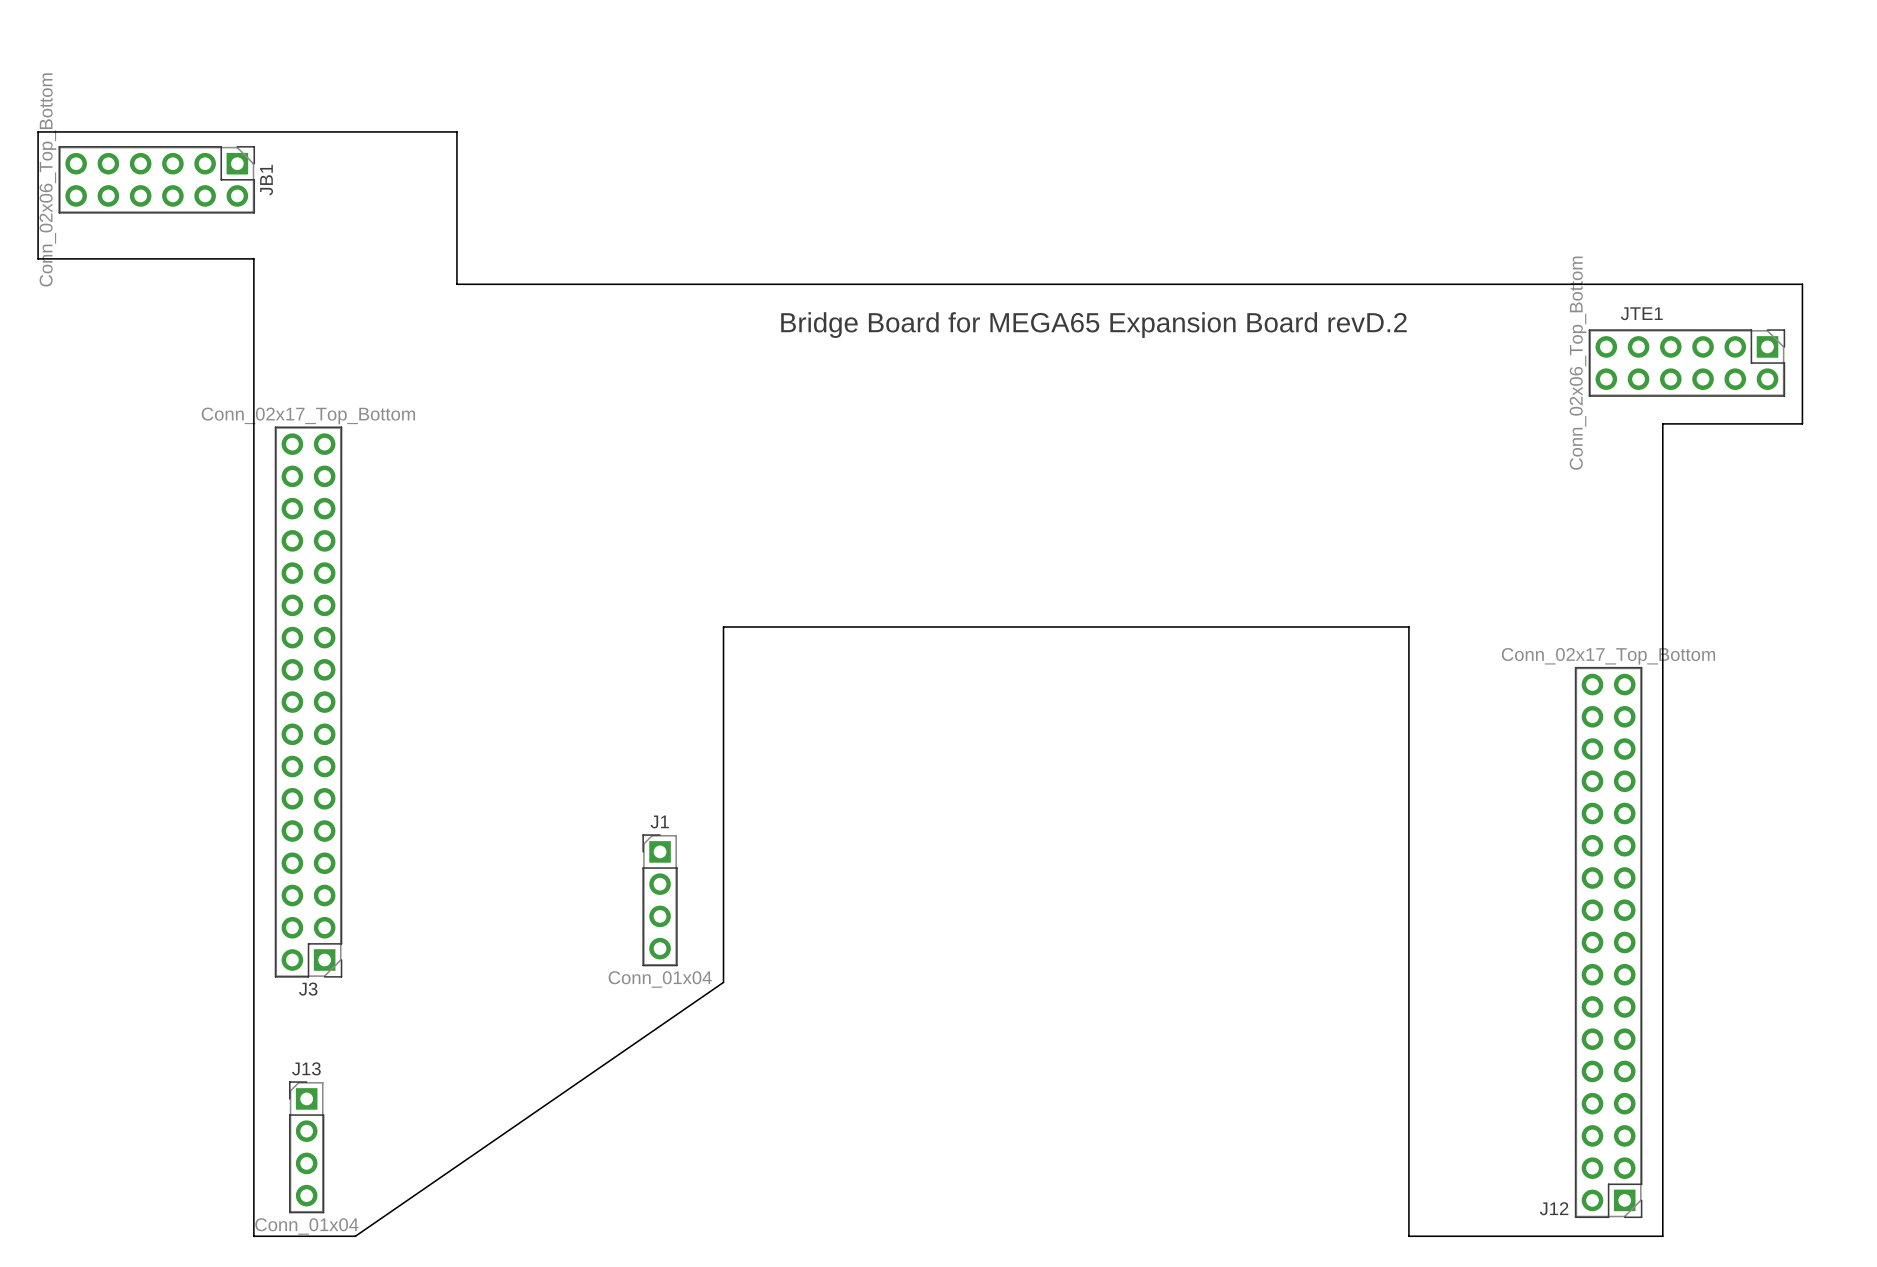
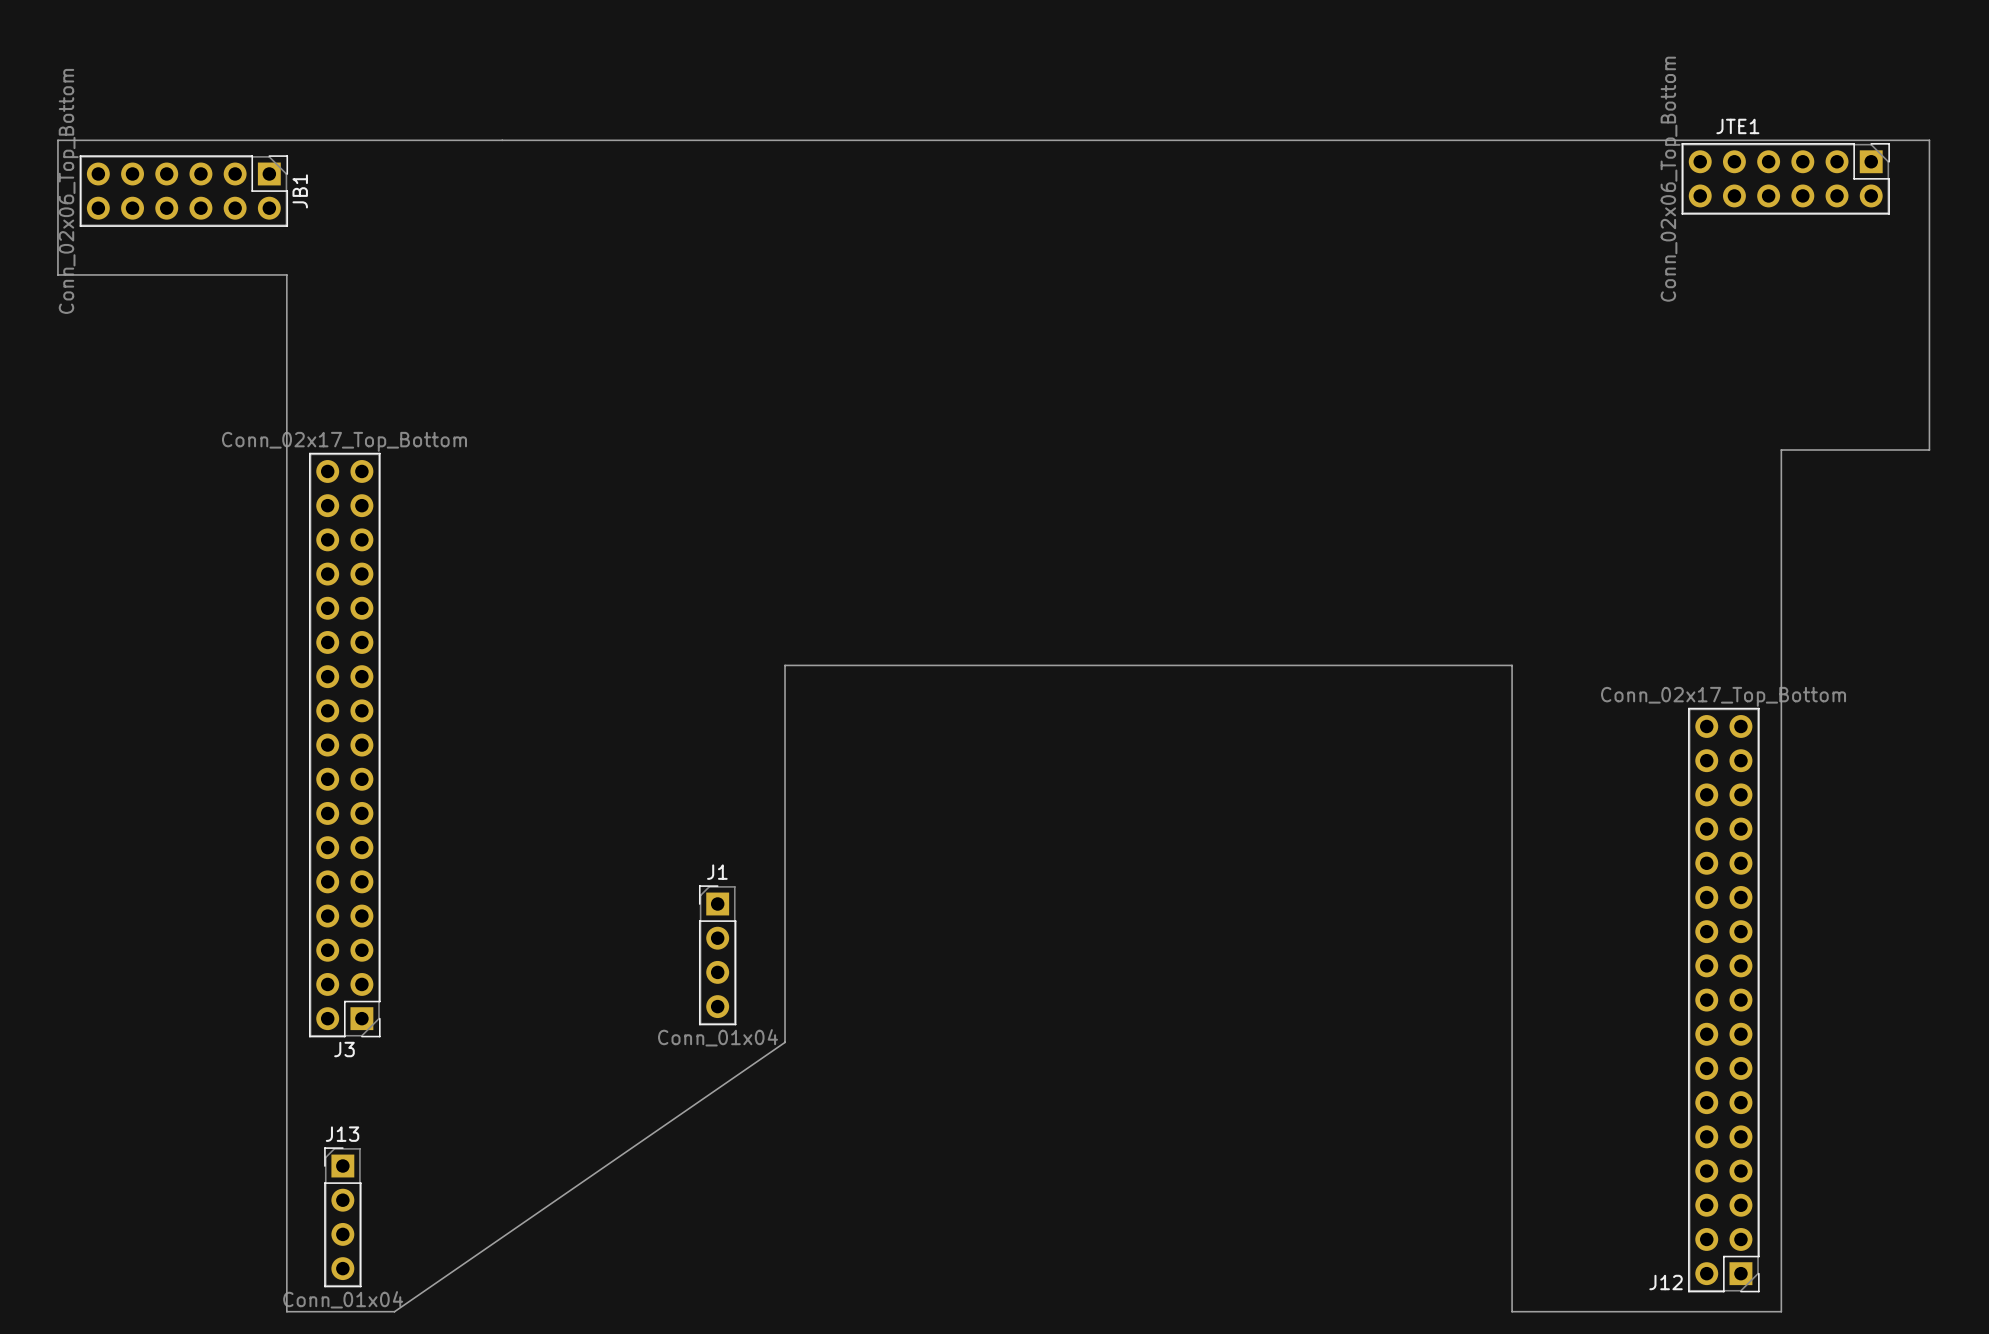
board edge: (456, 131) (456, 284) (1802, 284) -> (502, 140) (1929, 140) (1929, 301)
text: Bridge Board for MEGA65 Expansion Board revD.2 (1093, 325) -> none
JTE1 position: (1686, 363) -> (1785, 178)

